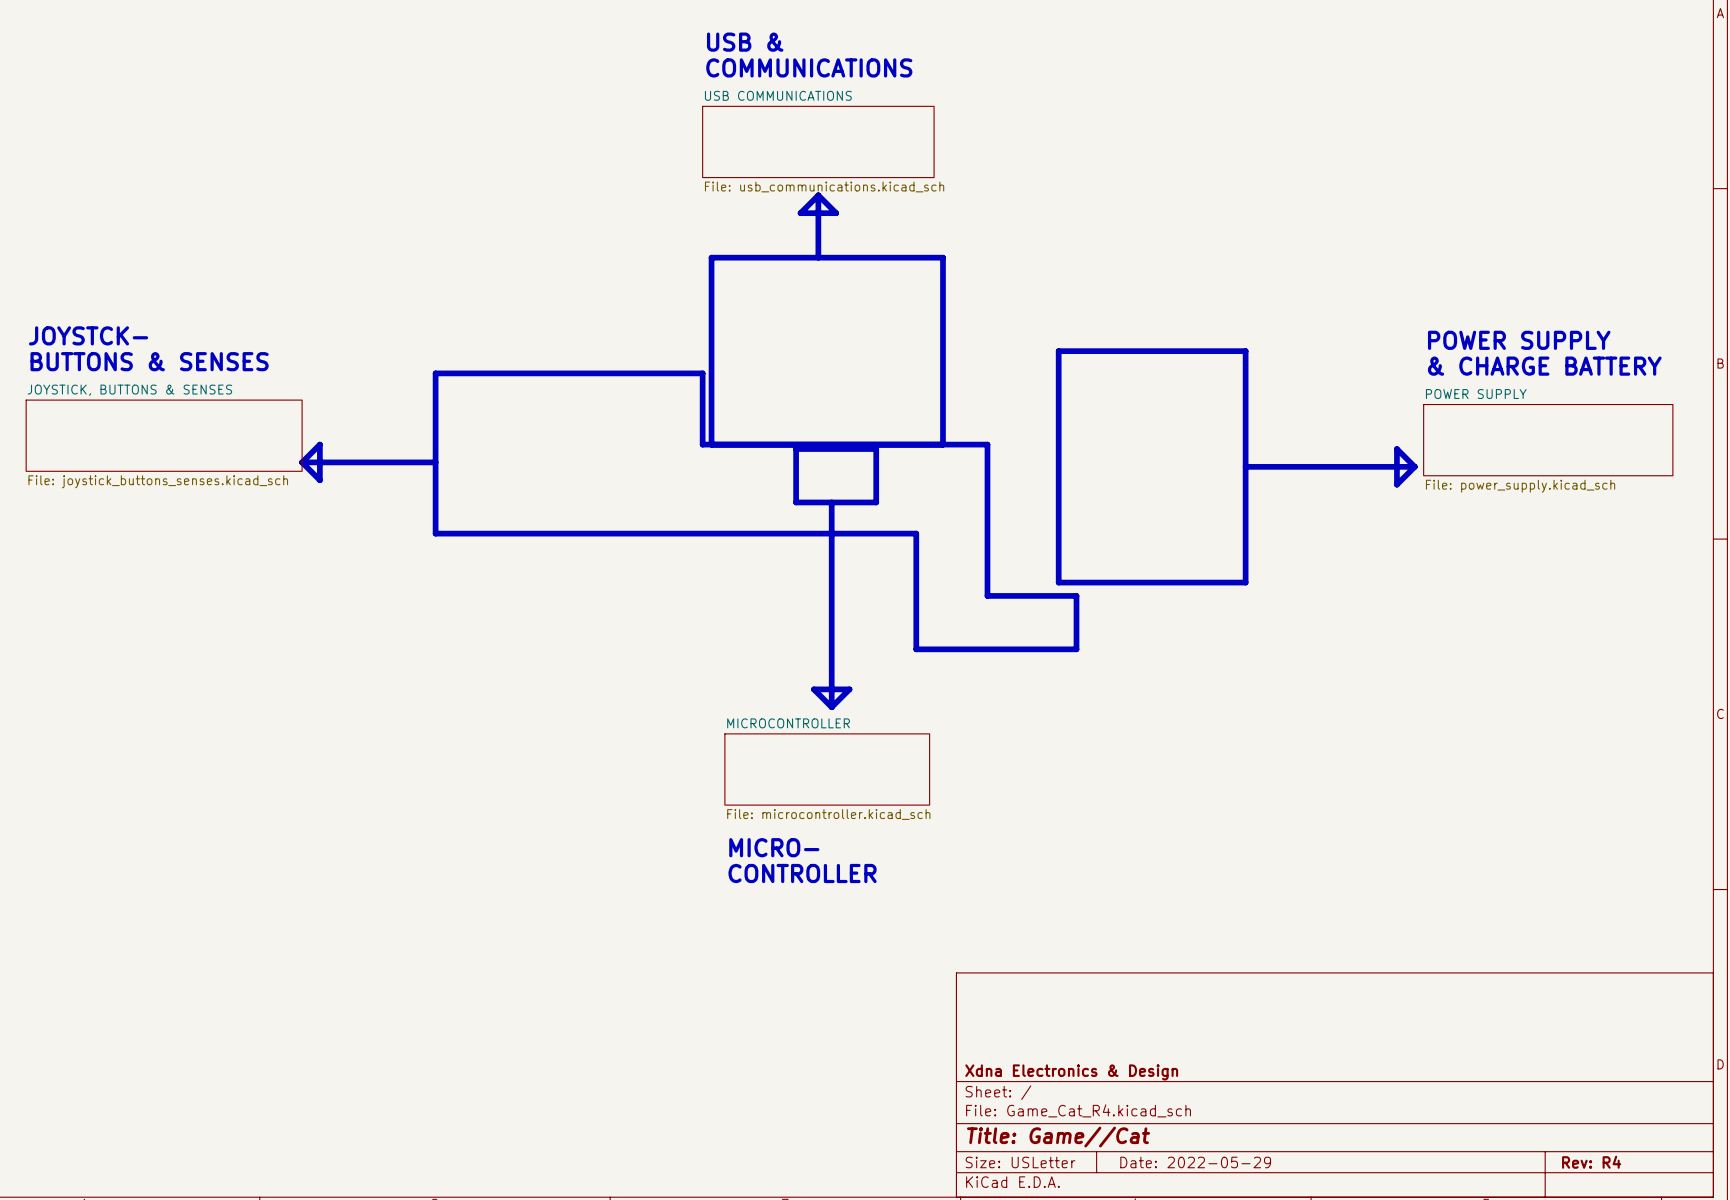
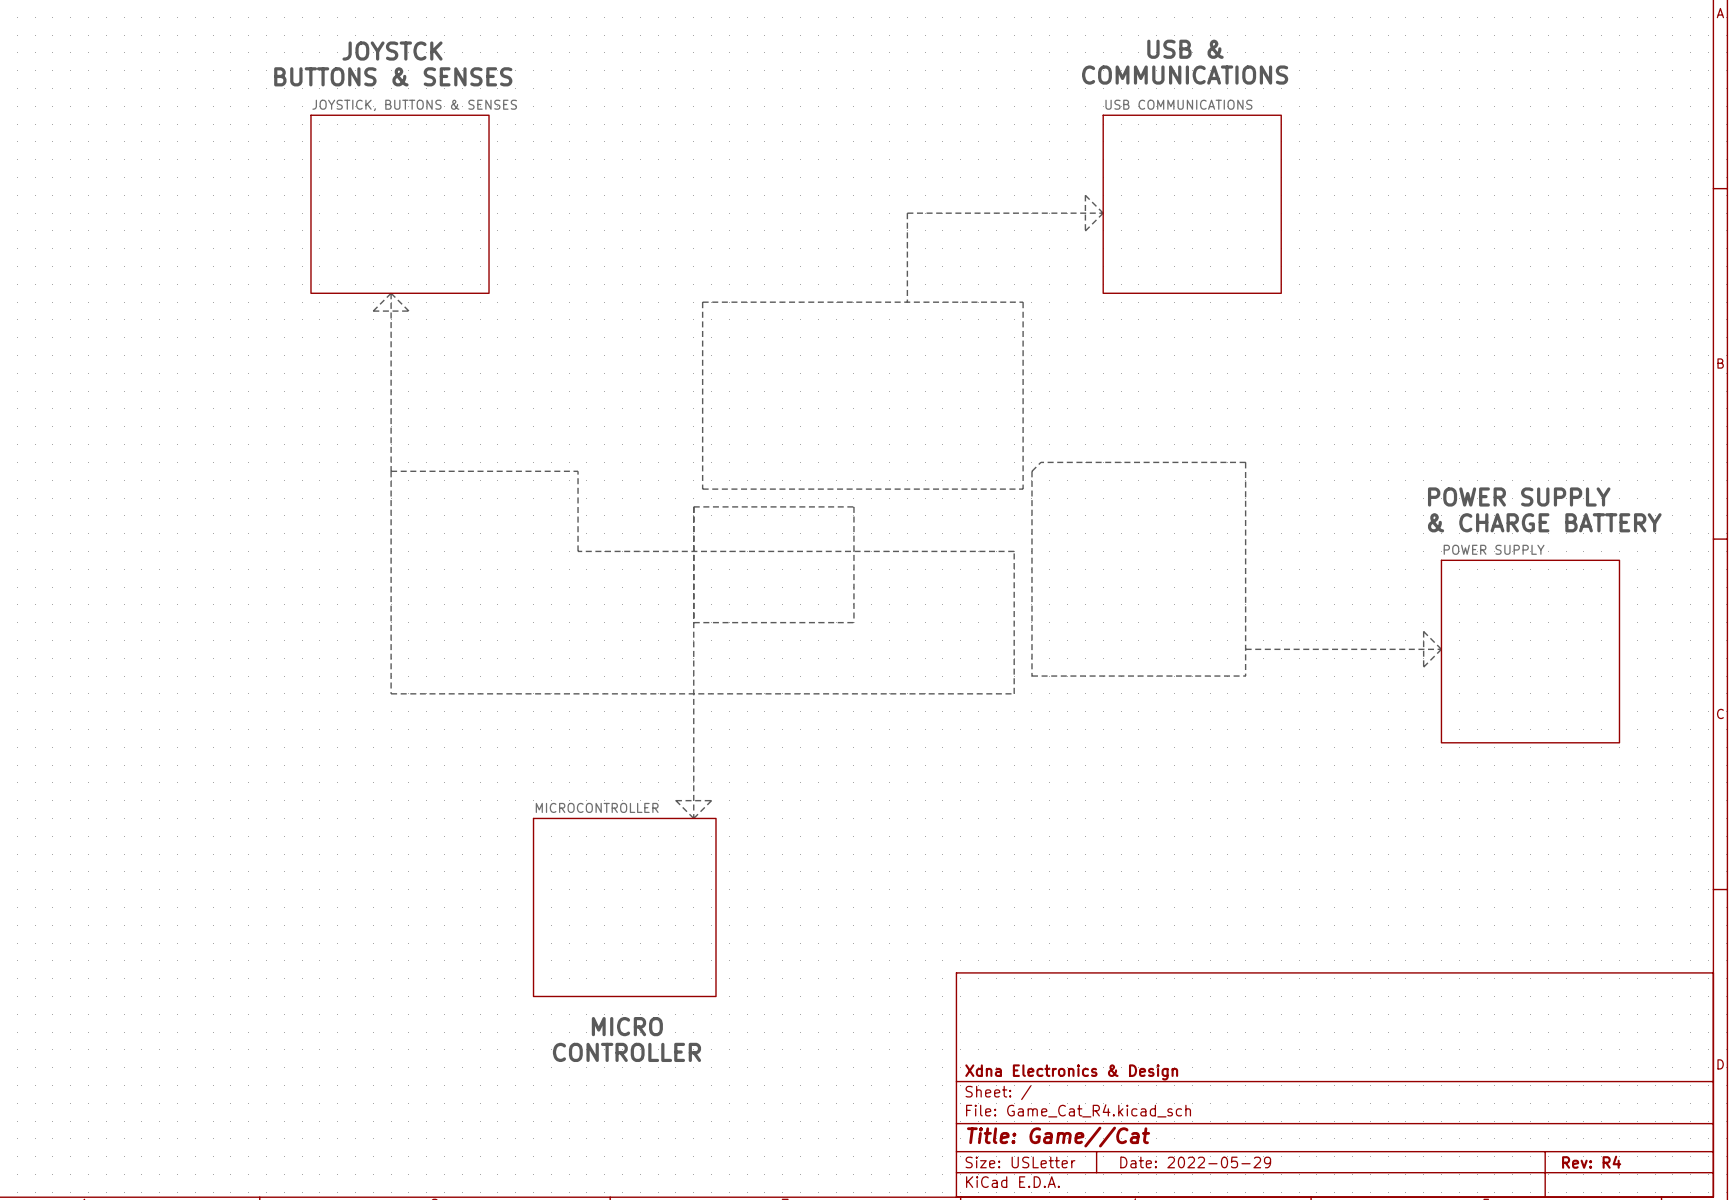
text: USB & (745, 42) -> none
text: none -> USB & (1185, 49)
text: none -> JOYSTCK (392, 51)
text: COMMUNICATIONS (809, 67) -> none
text: none -> COMMUNICATIONS (1185, 75)
text: none -> BUTTONS & SENSES (393, 76)
sheet USB COMMUNICATIONS: File: usb_communications.kicad_sch (818, 141) -> none
line: (818, 195) (836, 213) (800, 213) (818, 195) -> none
line: (818, 195) (818, 257) -> none
sheet JOYSTICK, BUTTONS & SENSES: none -> (400, 204)
sheet USB COMMUNICATIONS: none -> (1192, 204)
line: none -> (1103, 213) (907, 213) (907, 302)
line: none -> (1103, 213) (1085, 230) (1085, 195) (1103, 213)
line: none -> (391, 293) (373, 311) (408, 311) (391, 293)
line: none -> (391, 293) (391, 693) (1014, 693) (1014, 551) (578, 551) (578, 471) (391, 471)
line: none -> (702, 302) (702, 489) (1023, 489) (1023, 302) (702, 302)
text: JOYSTCK- (88, 335) -> none
text position: POWER SUPPLY (1519, 340) -> POWER SUPPLY (1519, 496)
line: (1058, 351) (1245, 351) (1245, 582) (1058, 582) (1058, 351) -> none
text: BUTTONS & SENSES (149, 361) -> none
text position: & CHARGE BATTERY (1544, 366) -> & CHARGE BATTERY (1544, 522)
line: (435, 373) (702, 373) (702, 444) (987, 444) (987, 595) (1076, 595) (1076, 649) (916, 649) (916, 533) (435, 533) (435, 373) -> none
sheet JOYSTICK, BUTTONS & SENSES: File: joystick_buttons_senses.kicad_sch (164, 435) -> none
sheet POWER SUPPLY: File: power_supply.kicad_sch (1548, 440) -> none
line: (711, 444) (711, 257) (942, 257) (942, 444) -> none
line: (796, 449) (876, 449) (876, 502) (796, 502) (796, 449) -> none
line: (302, 462) (319, 480) (319, 444) (302, 462) -> none
line: (302, 462) (435, 462) -> none
line: none -> (1040, 462) (1245, 462) (1245, 676) (1031, 676) (1031, 471) (1040, 462)
line: (1245, 466) (1414, 466) -> none
line: (1414, 466) (1396, 484) (1396, 449) (1414, 466) -> none
line: (831, 502) (831, 707) -> none
line: none -> (693, 622) (853, 622) (853, 506) (693, 506) (693, 818)
line: none -> (1245, 649) (1441, 649)
line: none -> (1441, 649) (1423, 631) (1423, 667) (1441, 649)
sheet POWER SUPPLY: none -> (1530, 651)
line: (831, 707) (849, 689) (813, 689) (831, 707) -> none
sheet MICROCONTROLLER: File: microcontroller.kicad_sch (827, 769) -> none
line: none -> (693, 818) (675, 800) (711, 800) (693, 818)
text: MICRO- (774, 847) -> none
text: CONTROLLER (802, 873) -> none
sheet MICROCONTROLLER: none -> (624, 907)
text: none -> MICRO (627, 1026)
text: none -> CONTROLLER (626, 1052)

